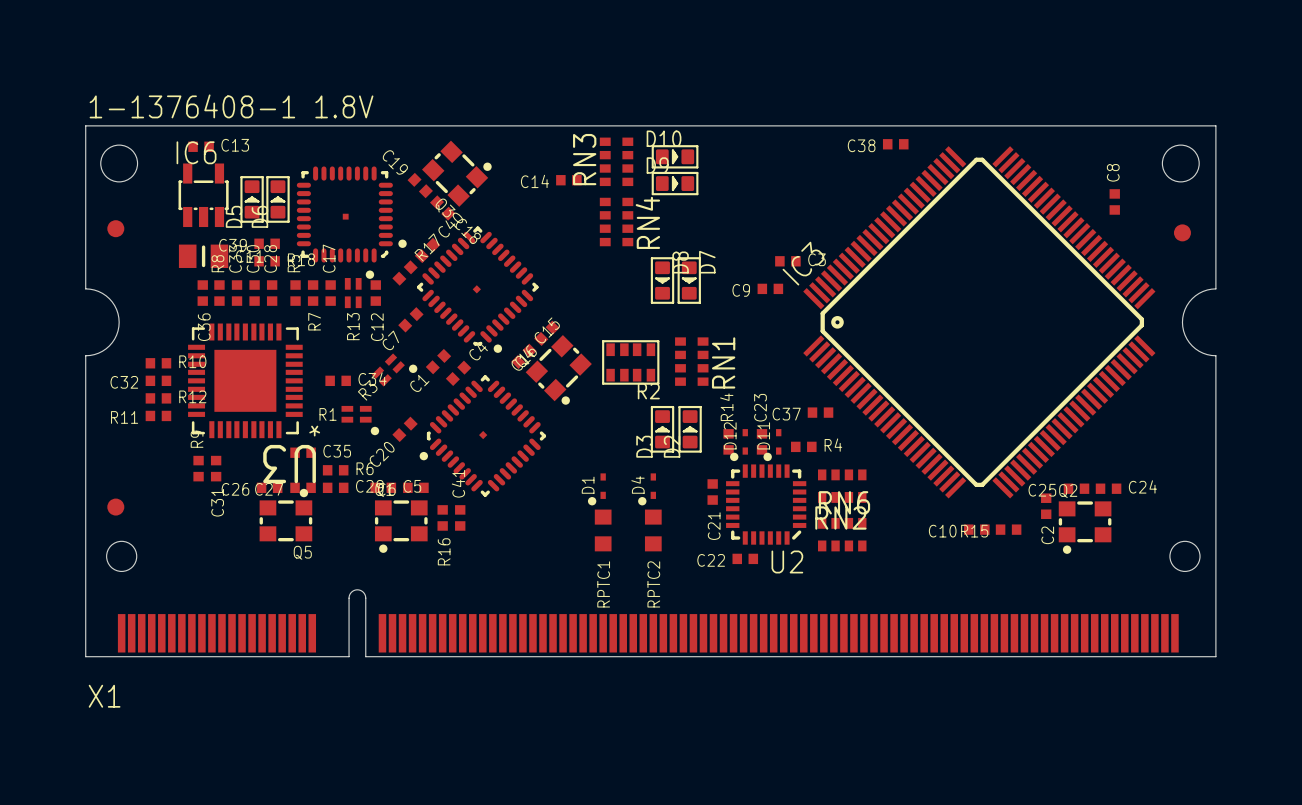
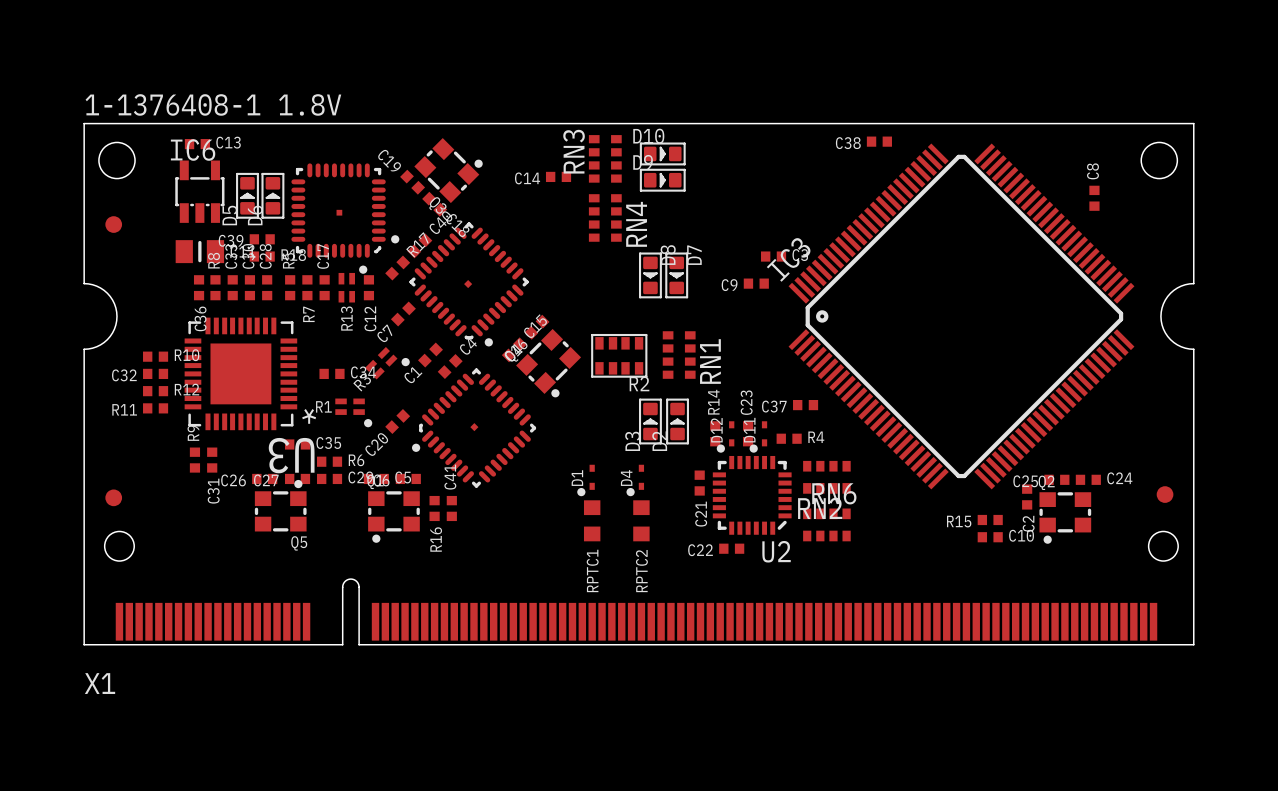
part position: (1182, 232) -> (1165, 494)
C10 position: (976, 529) -> (990, 537)
C10 name position: C10 (942, 531) -> C10 (1021, 535)

